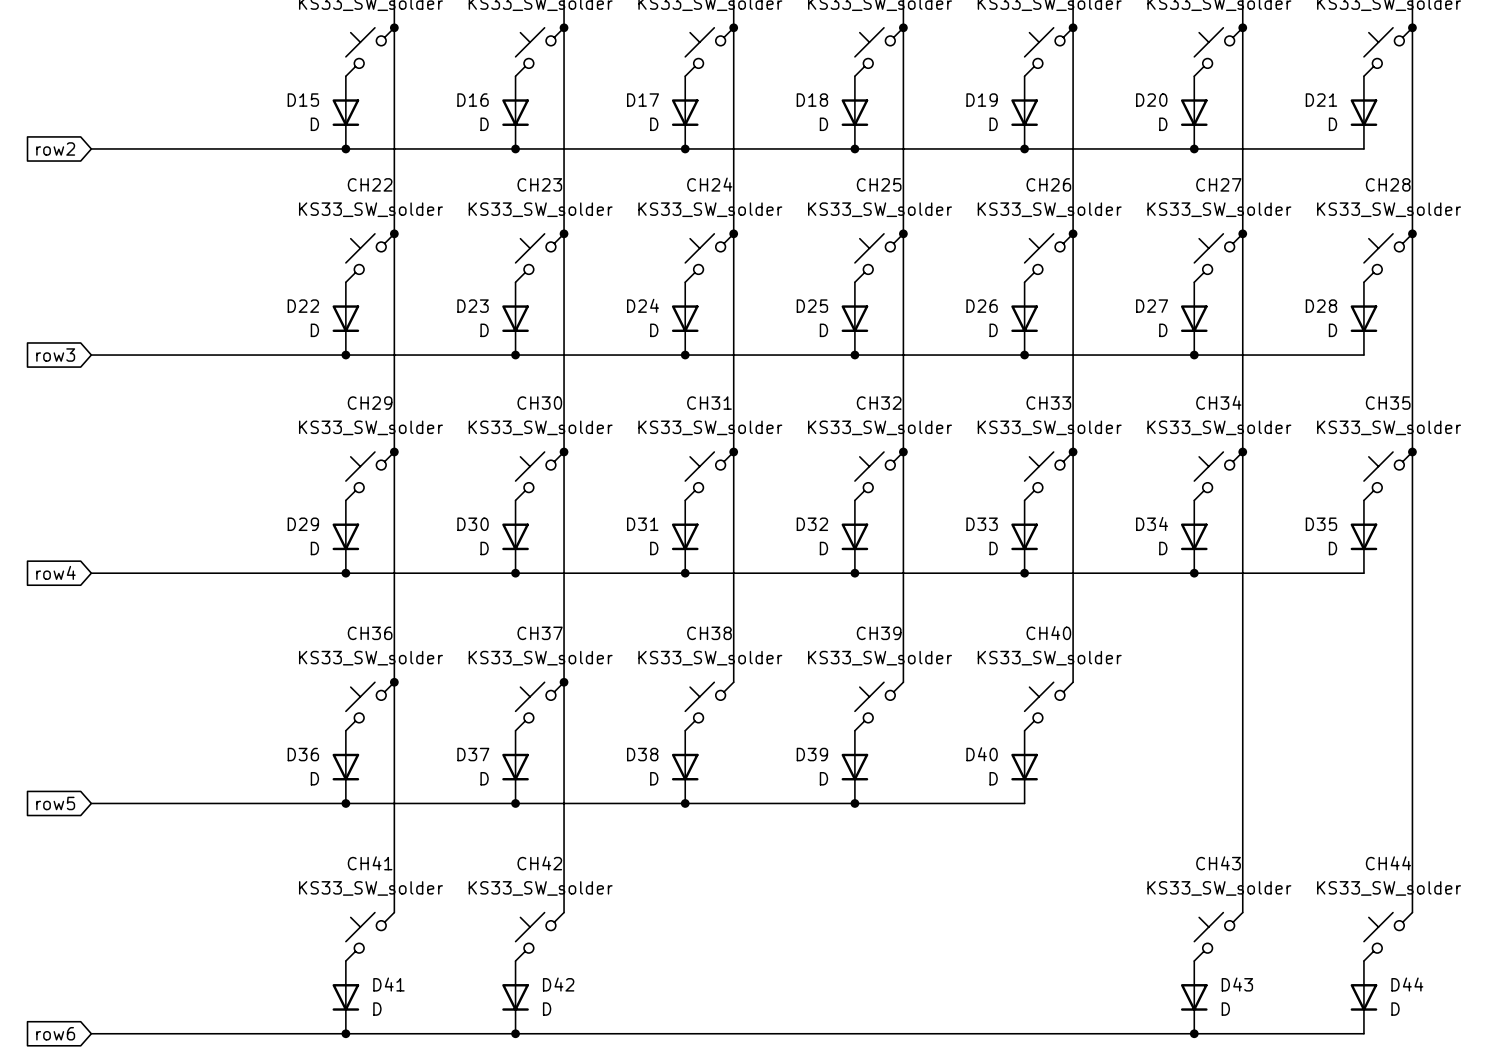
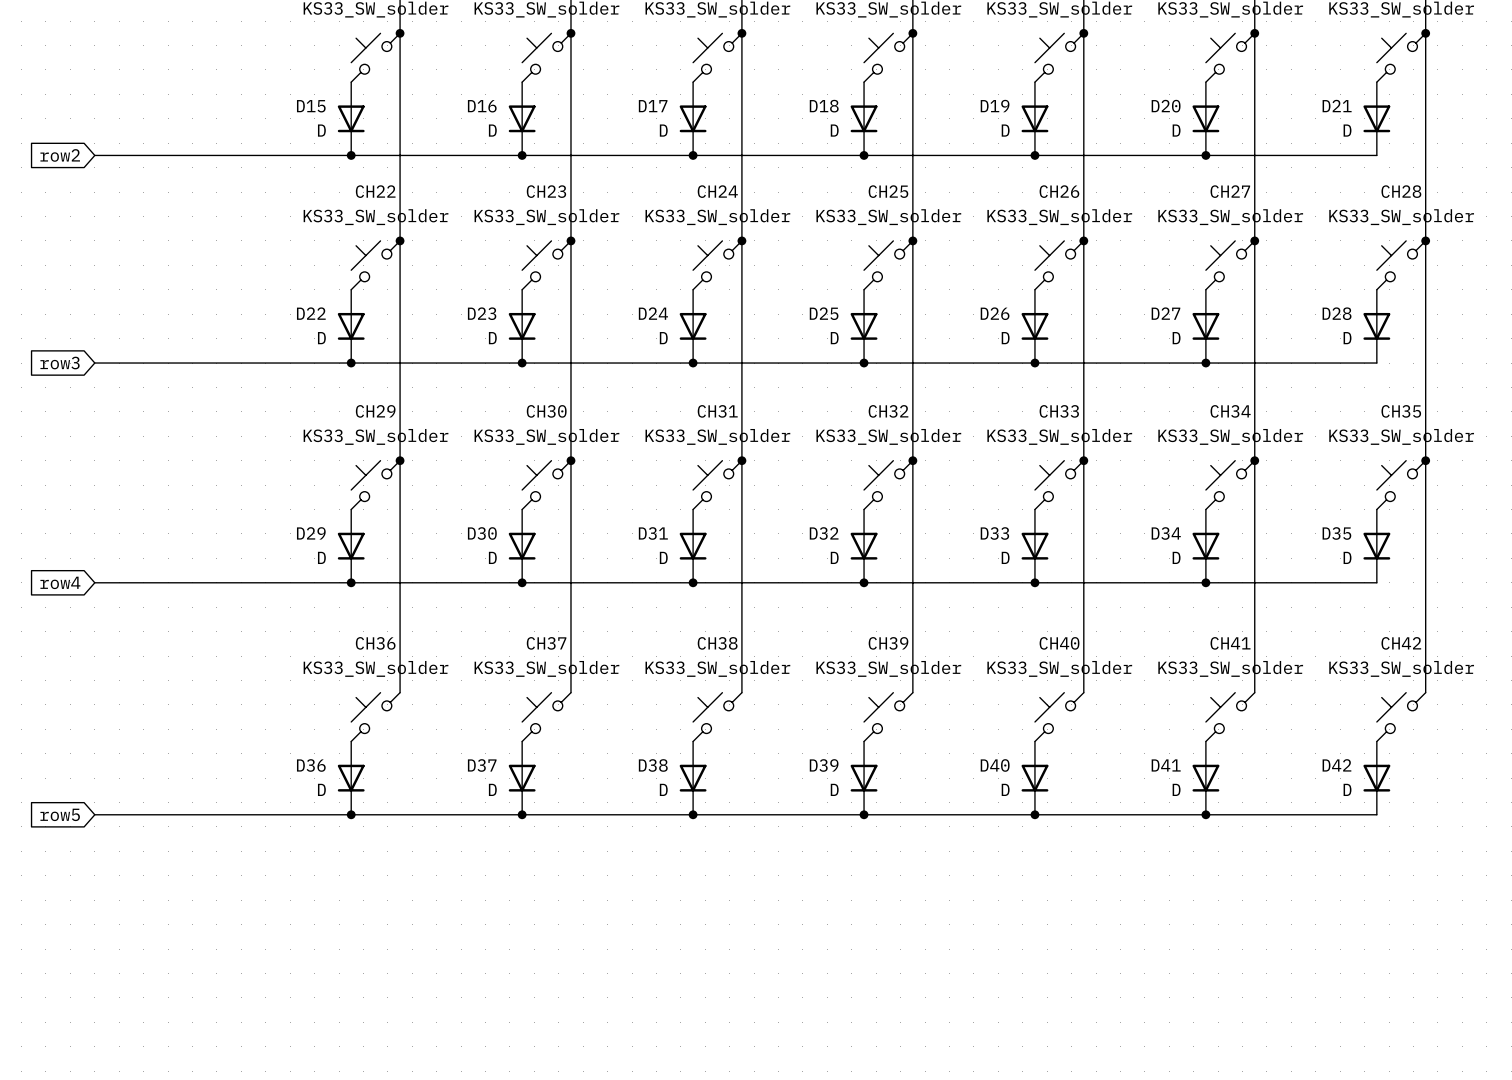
wire: (394, 682) (394, 912) -> none
junction: (394, 682) -> none
wire: (564, 682) (564, 912) -> none
junction: (564, 682) -> none
wire: (1242, 682) (1242, 912) -> none
wire: (1412, 682) (1412, 912) -> none
wire: none -> (1034, 814) (1376, 814)
junction: none -> (1034, 814)
junction: none -> (1205, 814)
CH41 position: (370, 936) -> (1230, 717)
CH42 position: (539, 936) -> (1401, 717)
CH43: KS33_SW_solder (1218, 936) -> none
CH44: KS33_SW_solder (1388, 936) -> none
D41 name position: D41 (388, 984) -> D41 (1166, 765)
D42 name position: D42 (558, 984) -> D42 (1336, 765)
D41 position: (345, 997) -> (1205, 778)
D42 position: (515, 997) -> (1376, 778)
D43: D (1194, 997) -> none
D44: D (1363, 997) -> none
D41 value position: D (377, 1009) -> D (1176, 789)
D42 value position: D (547, 1009) -> D (1347, 789)
global label: row6 (55, 1033) -> none
wire: (91, 1033) (1363, 1033) -> none
junction: (345, 1033) -> none
junction: (515, 1033) -> none
junction: (1194, 1033) -> none

